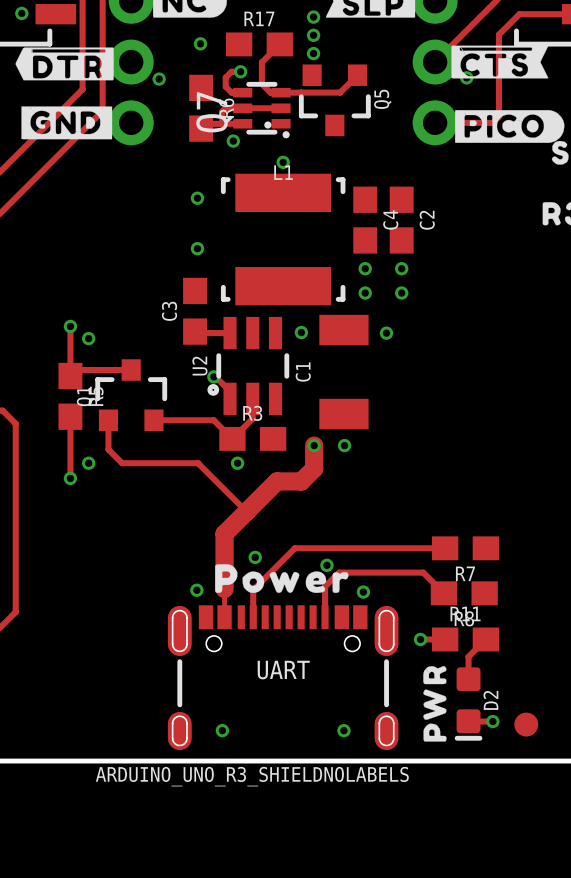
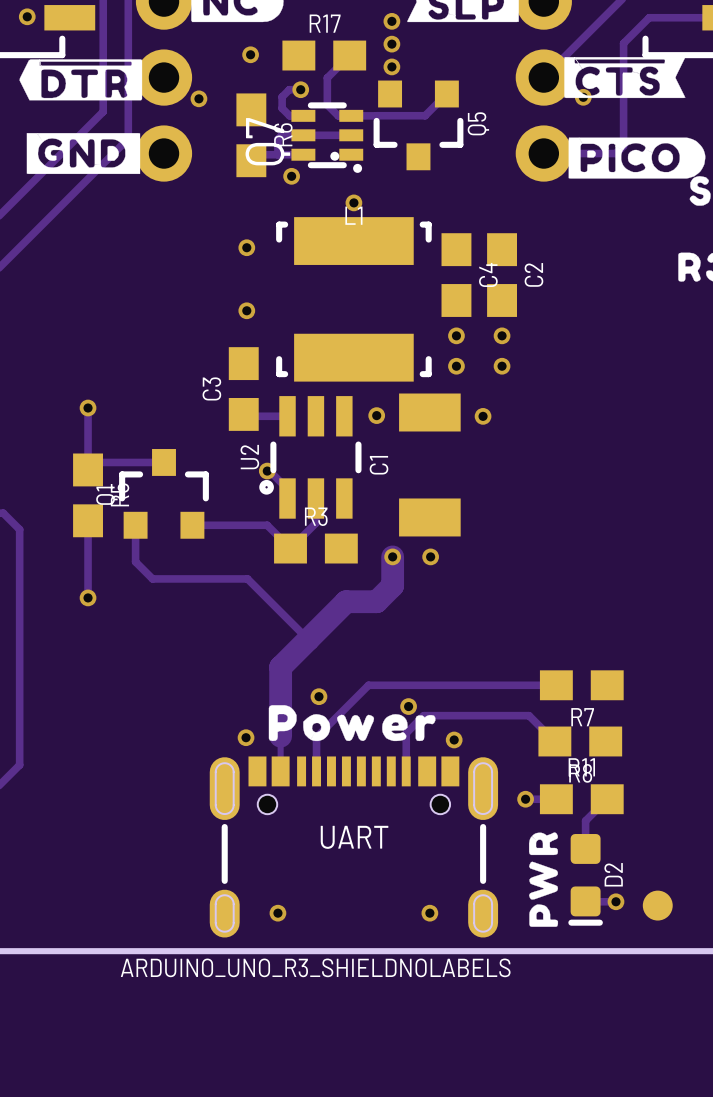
via: (88, 338) -> none
via: (88, 463) -> none
via: (237, 463) -> none

